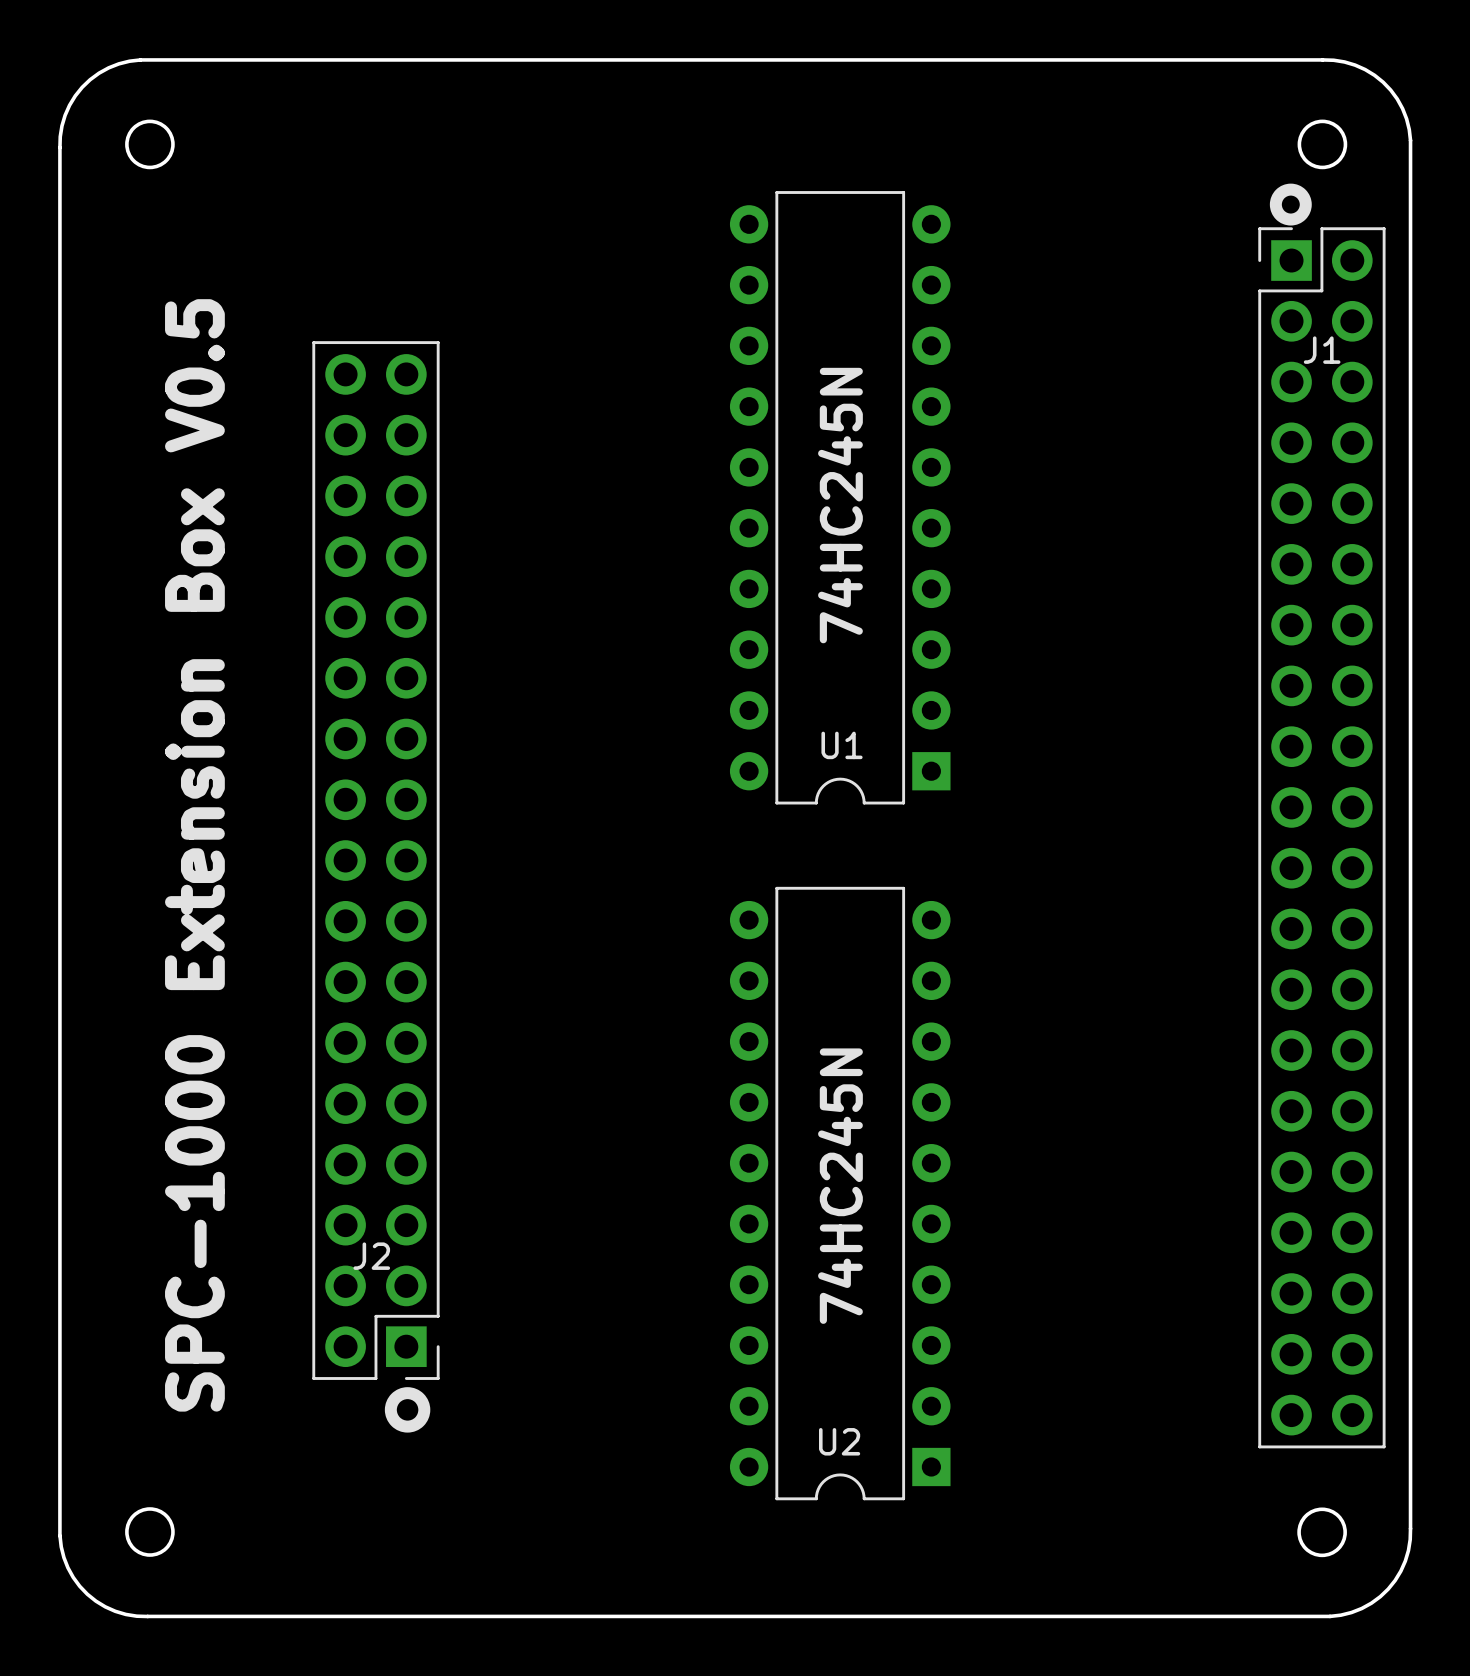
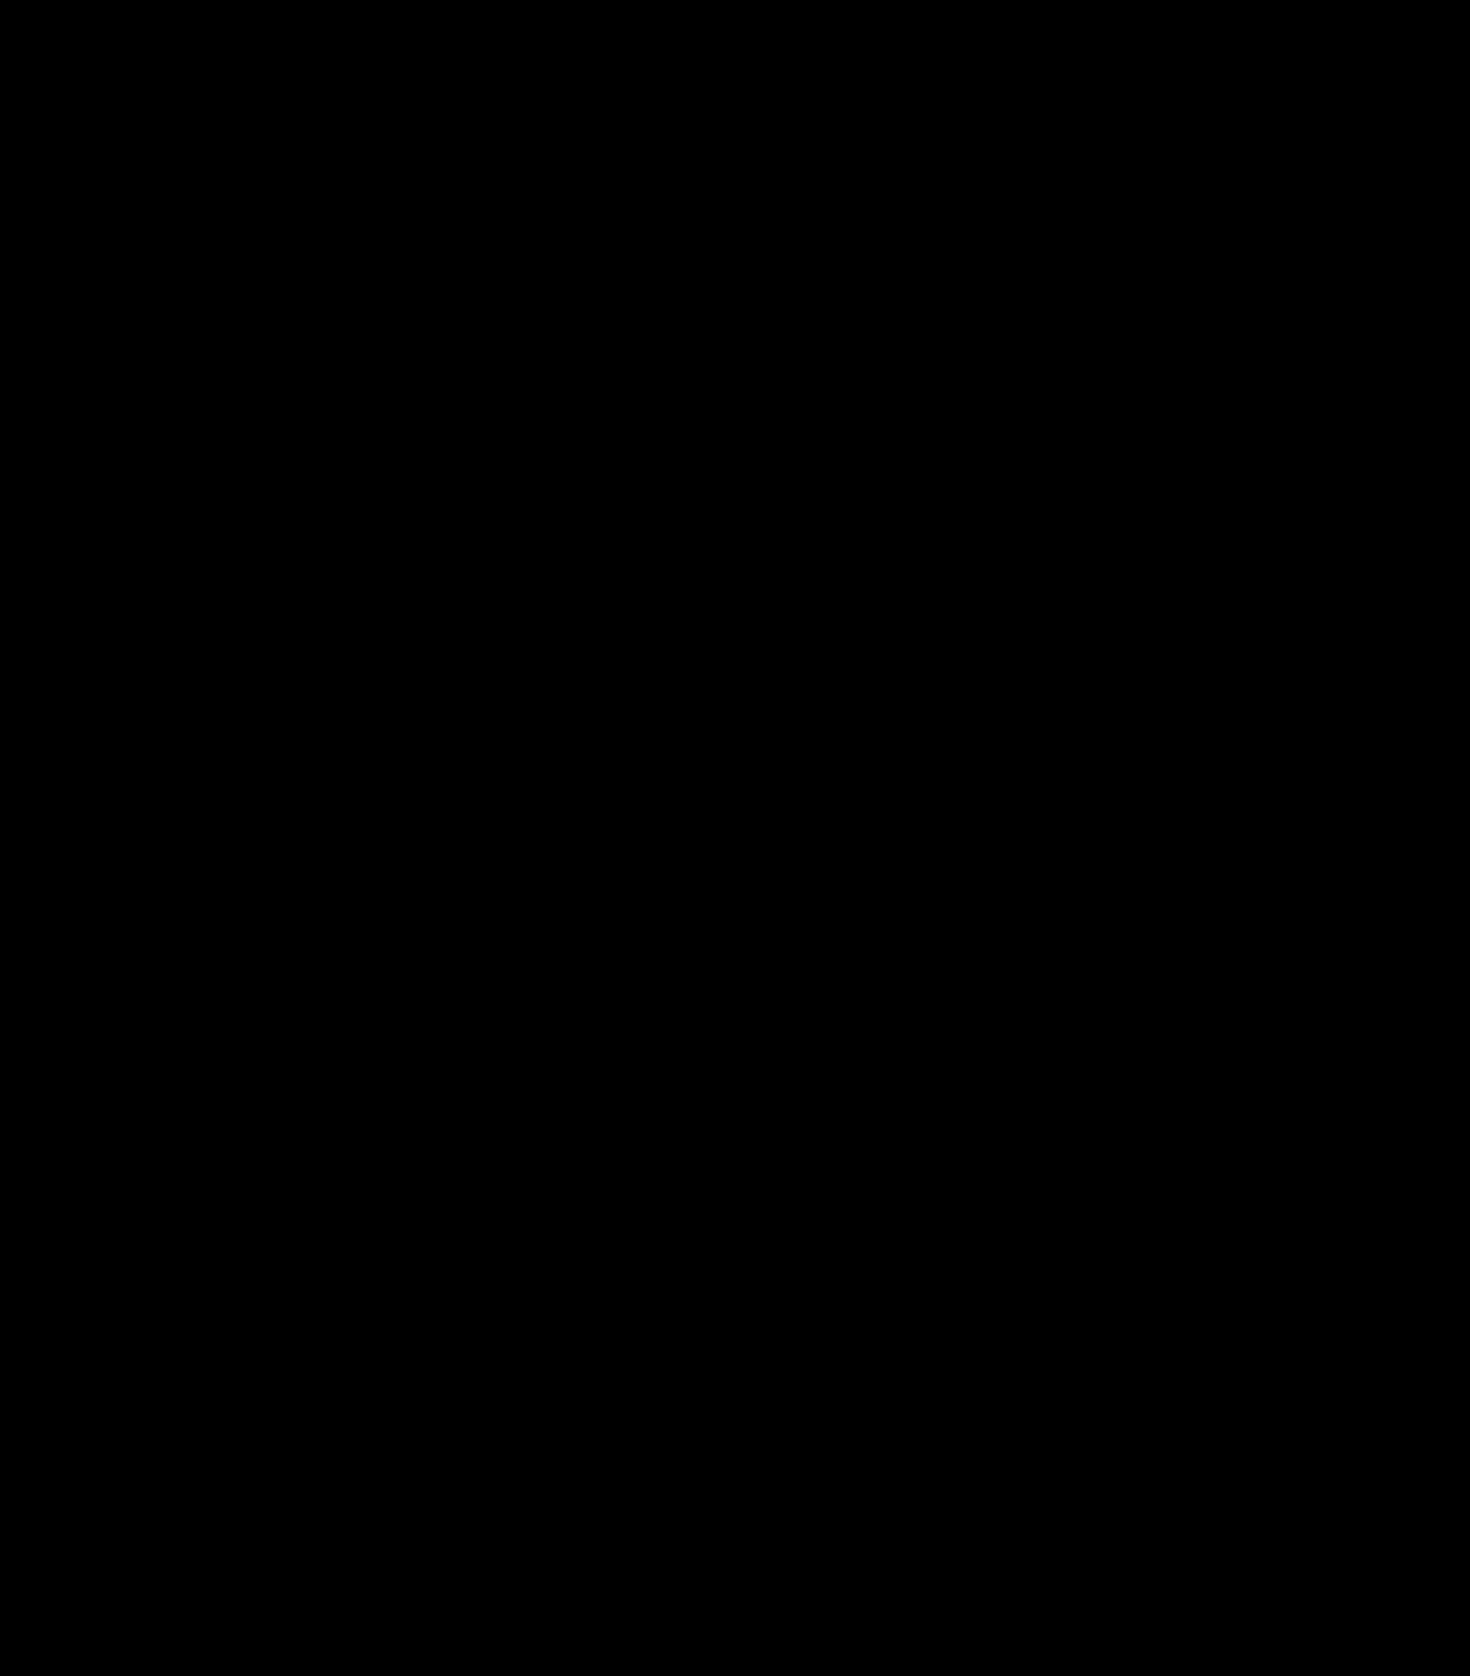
round board edge: [125, 119, 175, 170] -> none
round board edge: [1297, 119, 1348, 170] -> none
drawing: [1269, 183, 1312, 226] -> none
U1: (840, 497) -> none
text: 74HC245N (840, 505) -> none
J1: (1321, 837) -> none
text: SPC-1000 Extension Box V0.5 (194, 855) -> none
J2: (375, 860) -> none
text: 74HC245N (840, 1186) -> none
U2: (840, 1193) -> none
drawing: [384, 1387, 431, 1433] -> none
round board edge: [125, 1507, 175, 1557] -> none
round board edge: [1297, 1507, 1347, 1558] -> none
board edge: (59, 1535) (59, 147) (65, 115) (82, 87) (108, 67) (140, 59) (1322, 59) (1355, 65) (1383, 82) (1402, 108) (1410, 140) (1410, 1528) (1405, 1561) (1388, 1589) (1361, 1608) (1329, 1616) (136, 1616) (105, 1606) (87, 1594) (67, 1567) (59, 1535) -> none

